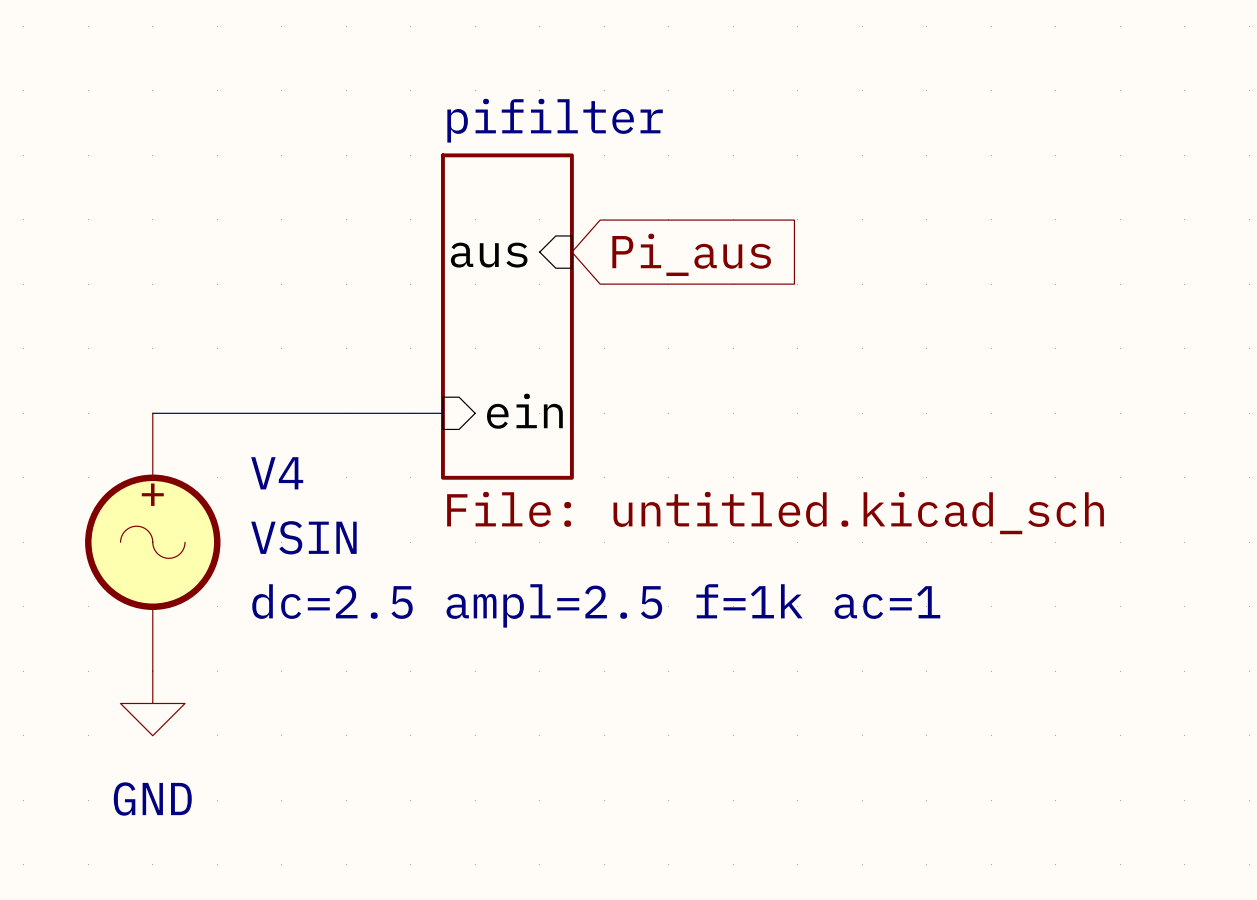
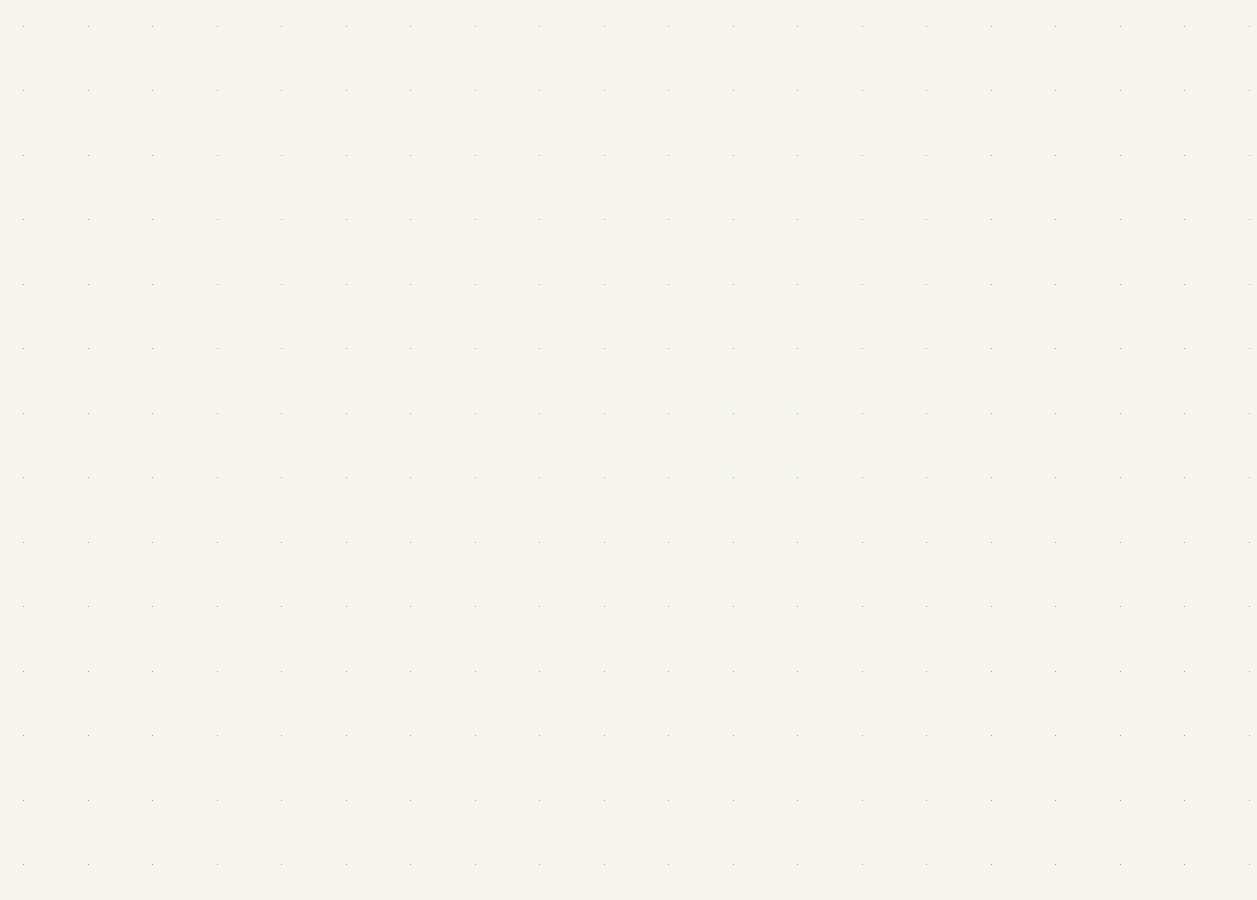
global label: Pi_aus (691, 254) -> none
sheet pin: aus (489, 255) -> none
sheet pifilter: File: untitled.kicad_sch (507, 316) -> none
sheet pin: ein (524, 411) -> none
wire: (152, 413) (442, 413) -> none
V4: VSIN (152, 542) -> none
power symbol: GND (152, 703) -> none

